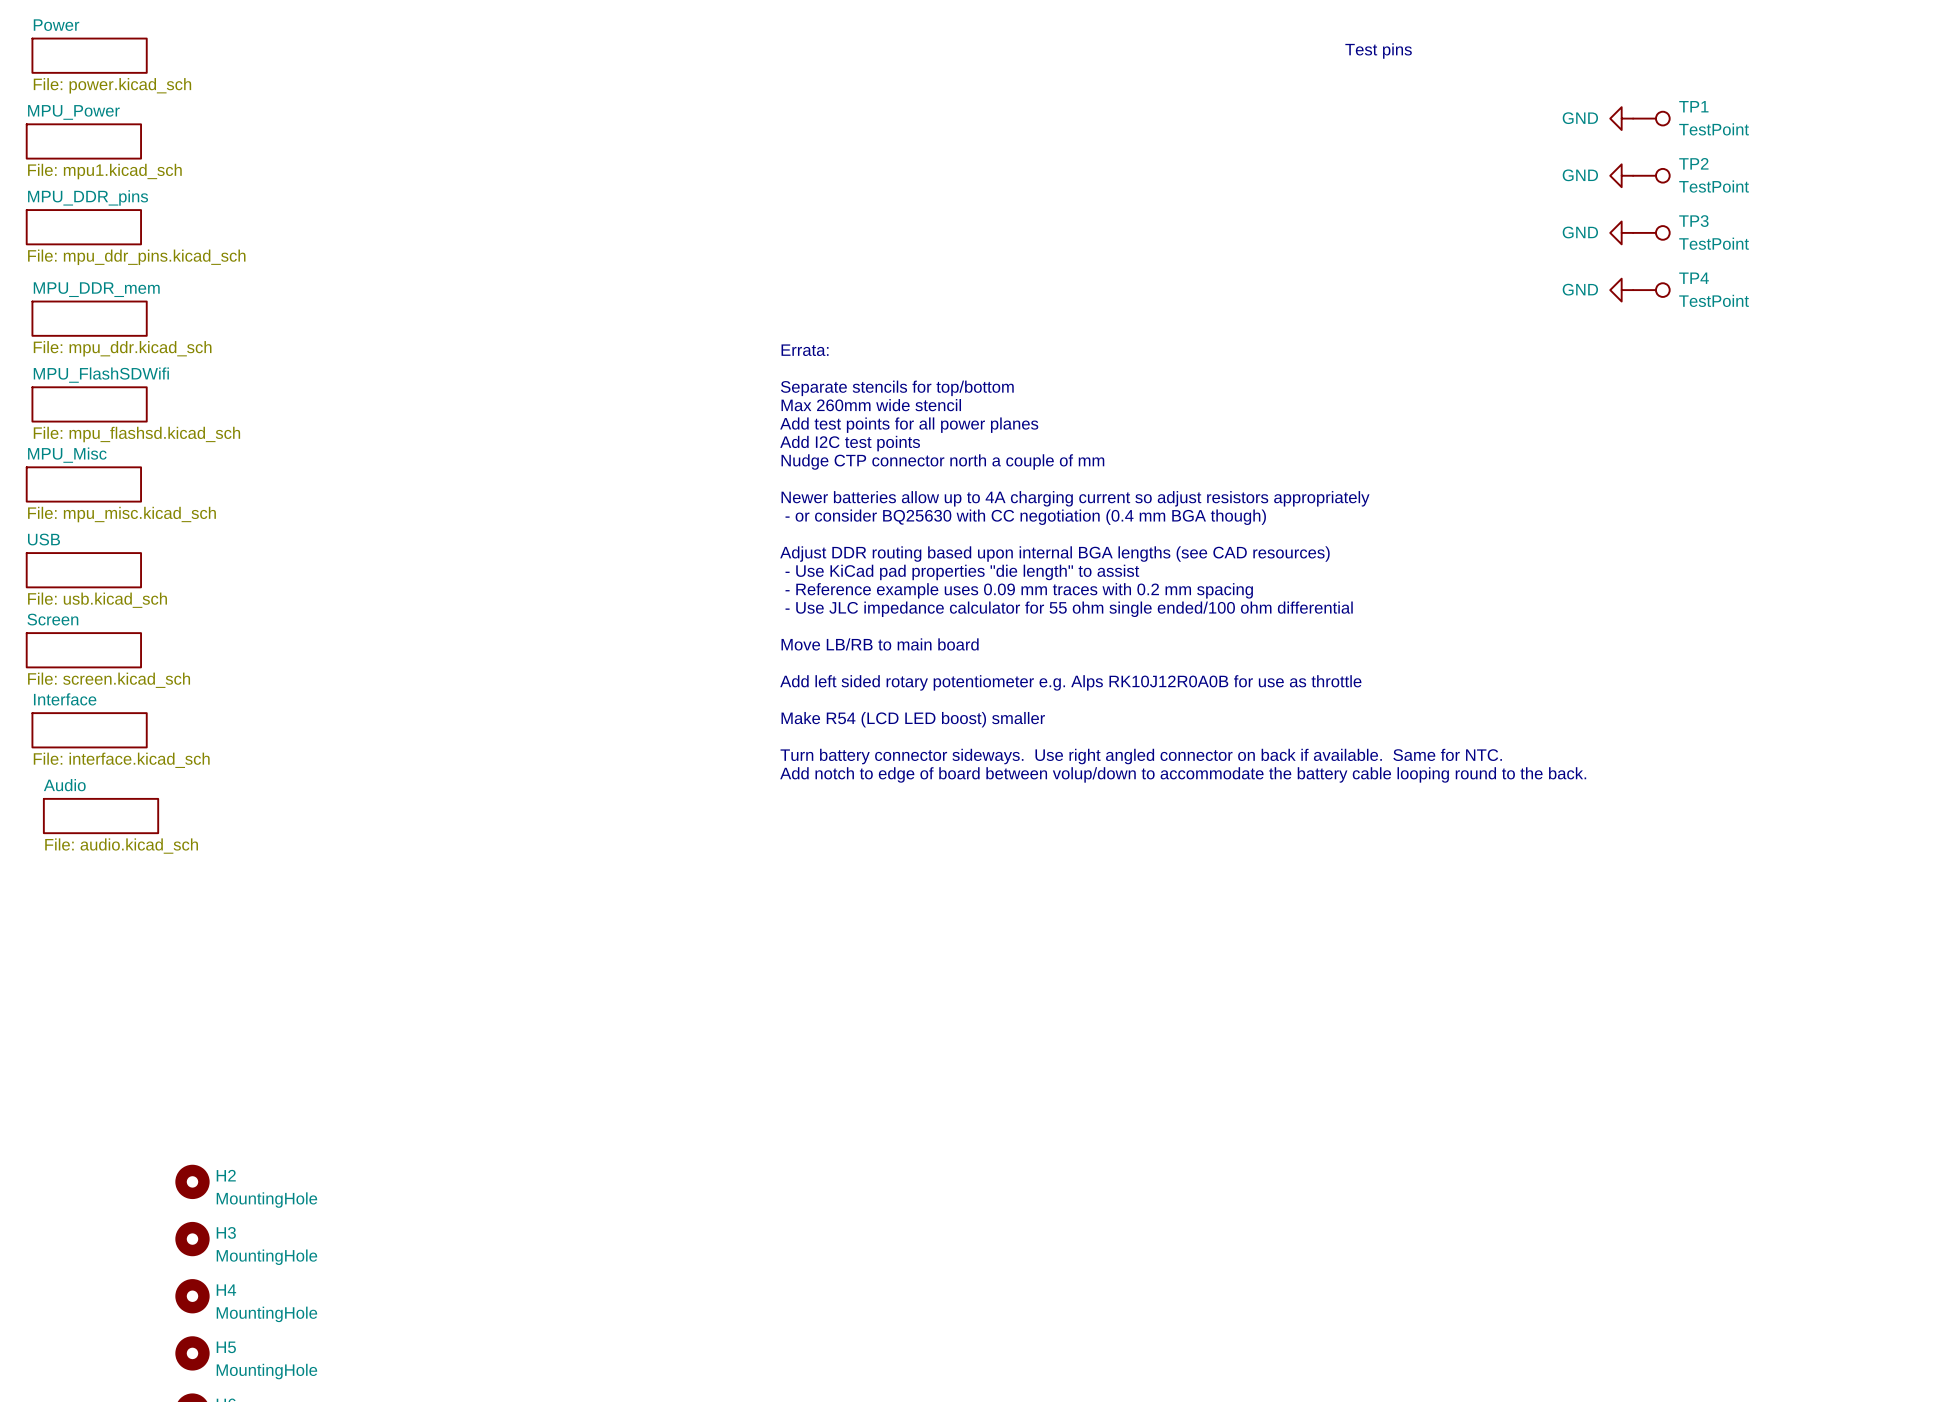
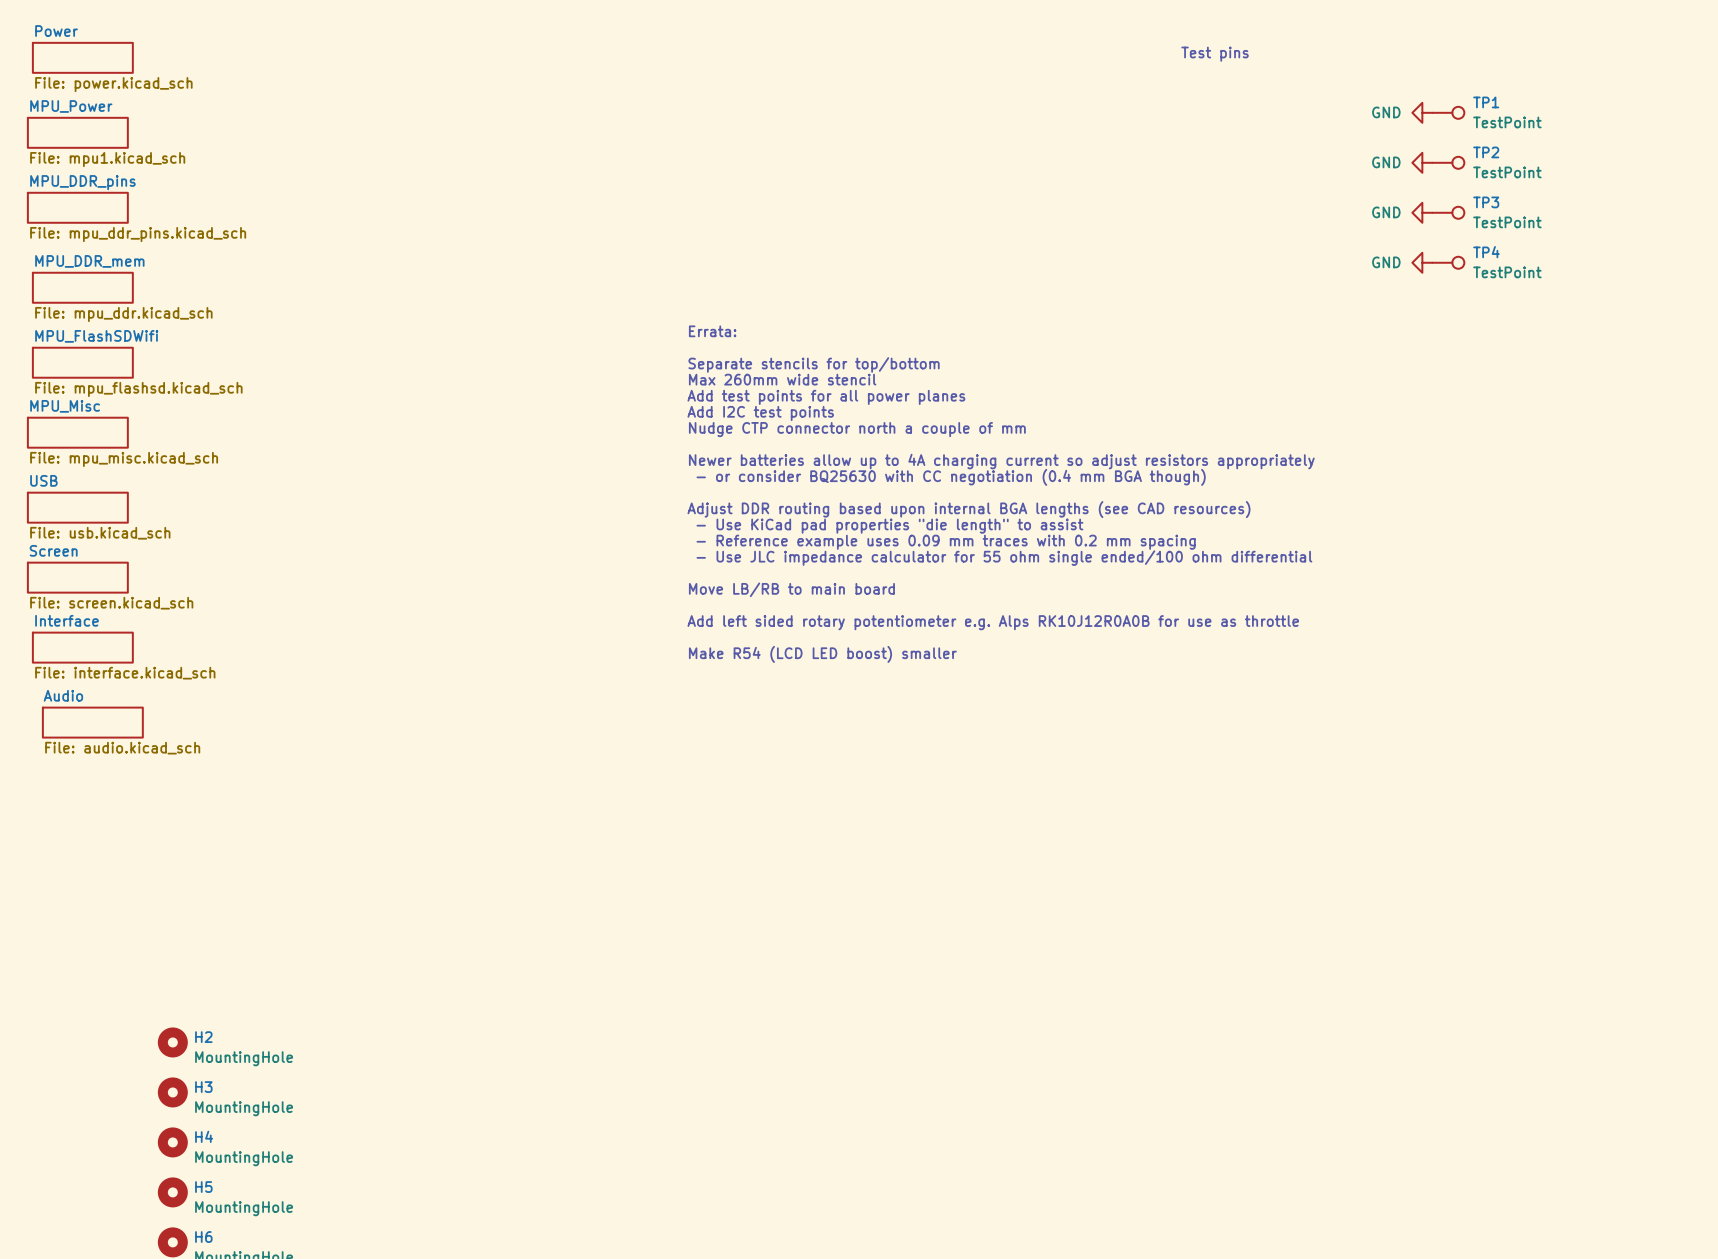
text position: Errata: (805, 350) -> Errata: (712, 331)
text: Separate stencils for top/bottom (897, 388) -> none
text: Max 260mm wide stencil (871, 405) -> Separate stencils for top/bottom (814, 364)
text: Add test points for all power planes (909, 425) -> Max 260mm wide stencil (782, 379)
text: Add I2C test points (850, 443) -> Add test points for all power planes (826, 397)
text: Nudge CTP connector north a couple of mm (942, 461) -> Add I2C test points (760, 413)
text: none -> Nudge CTP connector north a couple of mm (857, 429)
text: Newer batteries allow up to 4A charging current so adjust resistors appropriately (1075, 498) -> none
text: - or consider BQ25630 with CC negotiation (0.4 mm BGA though) (1025, 517) -> Newer batteries allow up to 4A charging current so adjust resistors appropriately (1001, 461)
text: none -> - or consider BQ25630 with CC negotiation (0.4 mm BGA though) (951, 477)
text: Adjust DDR routing based upon internal BGA lengths (see CAD resources) (1054, 554) -> none
text: - Use KiCad pad properties "die length" to assist (962, 572) -> Adjust DDR routing based upon internal BGA lengths (see CAD resources) (968, 509)
text: - Reference example uses 0.09 mm traces with 0.2 mm spacing (1019, 590) -> - Use KiCad pad properties "die length" to assist (889, 526)
text: - Use JLC impedance calculator for 55 ohm single ended/100 ohm differential (1069, 609) -> - Reference example uses 0.09 mm traces with 0.2 mm spacing (946, 542)
text: none -> - Use JLC impedance calculator for 55 ohm single ended/100 ohm differential (1004, 558)
text position: Move LB/RB to main board (880, 644) -> Move LB/RB to main board (791, 589)
text position: Add left sided rotary potentiometer e.g. Alps RK10J12R0A0B for use as throttle (1070, 682) -> Add left sided rotary potentiometer e.g. Alps RK10J12R0A0B for use as throttle (993, 622)
text position: Make R54 (LCD LED boost) smaller (913, 719) -> Make R54 (LCD LED boost) smaller (822, 654)
text: Turn battery connector sideways. Use right angled connector on back if available. Same for NTC. (1141, 756) -> none
text: Add notch to edge of board between volup/down to accommodate the battery cable looping round to the back. (1183, 774) -> none

